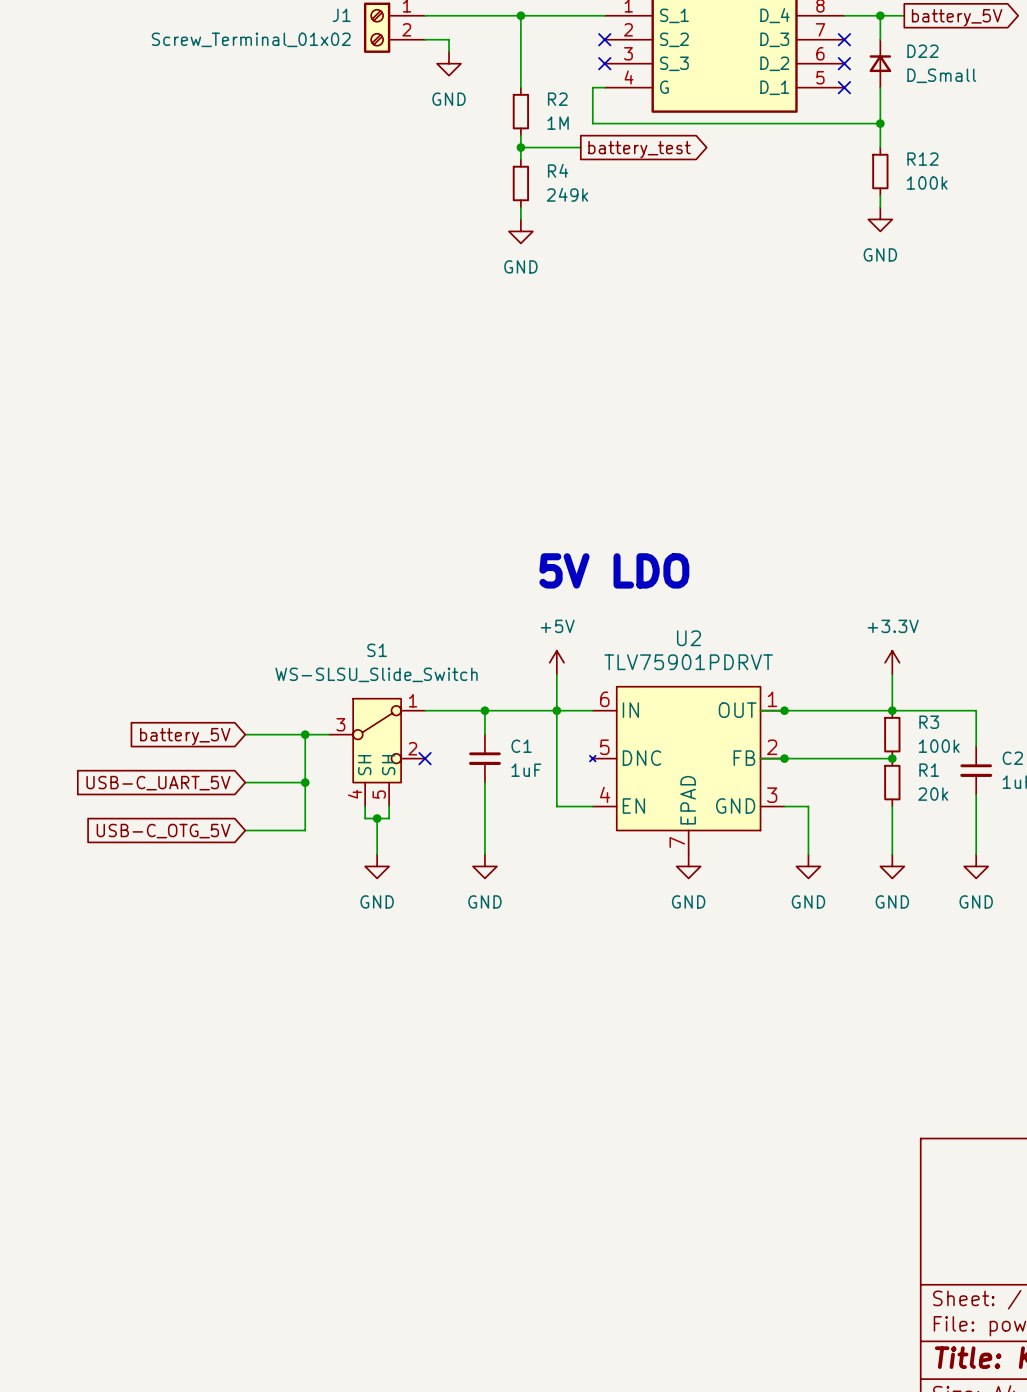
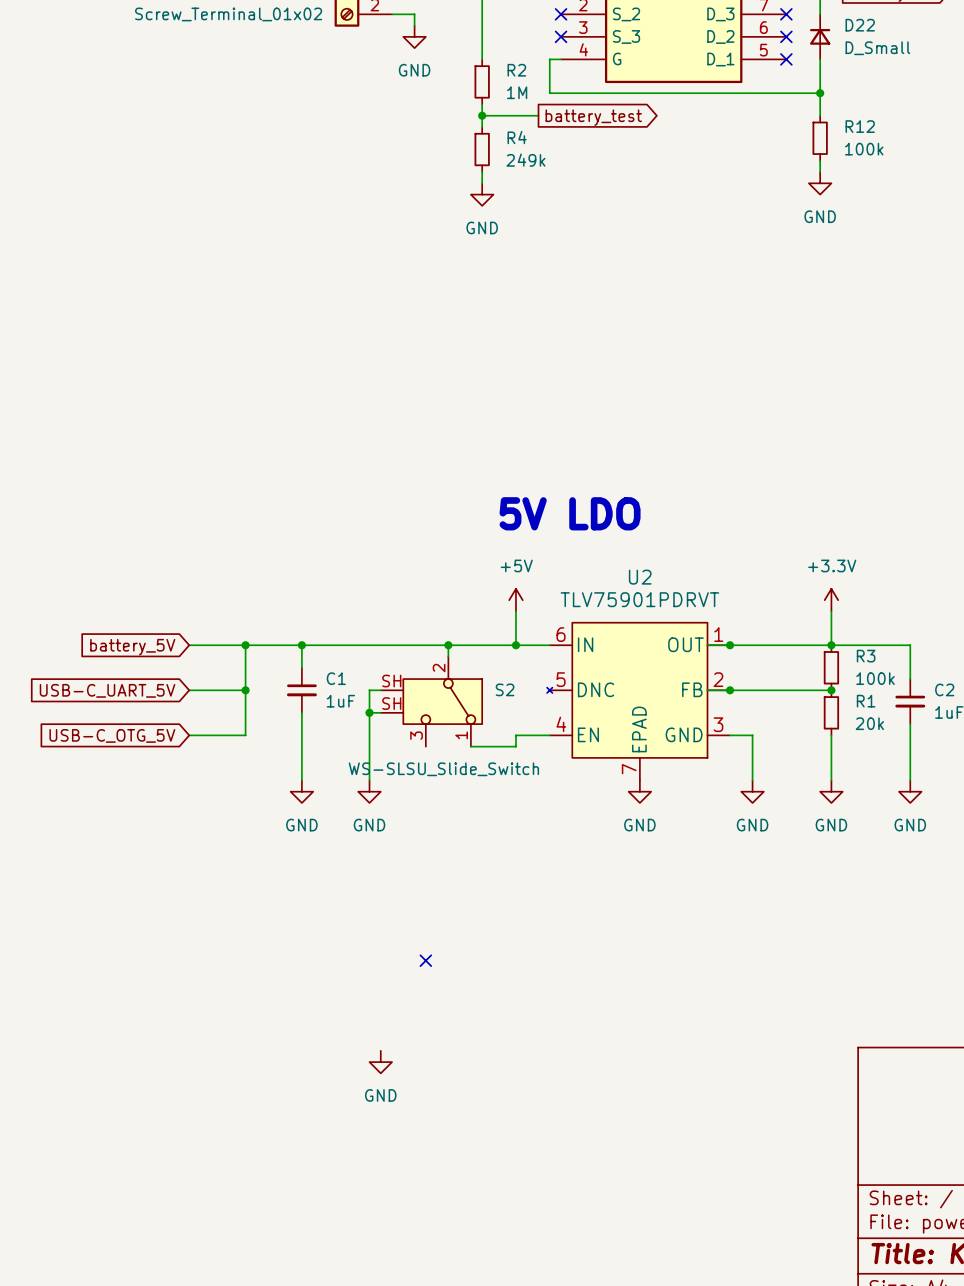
wire: none -> (189, 645) (392, 645)
junction: none -> (245, 645)
junction: none -> (301, 645)
wire: (556, 710) (556, 806) -> (470, 746) (515, 746) (515, 735)
wire: (245, 734) (329, 734) -> (301, 645) (301, 667)
wire: (305, 734) (305, 830) (245, 830) -> (245, 645) (245, 735) (189, 735)
junction: (305, 734) -> none
global label position: battery_5V (185, 736) -> battery_5V (132, 647)
S1: WS-SLSU_Slide_Switch (377, 752) -> none
junction: none -> (245, 690)
wire: none -> (380, 690) (369, 690) (369, 780)
no-connect mark: (425, 758) -> none
C1 position: (484, 758) -> (301, 690)
S2: none -> WS-SLSU_Slide_Switch (431, 701)
wire: (245, 782) (305, 782) -> (189, 690) (245, 690)
junction: (305, 782) -> none
wire: none -> (369, 712) (380, 712)
wire: (484, 782) (484, 854) -> (301, 712) (301, 780)
global label position: USB-C_UART_5V (158, 783) -> USB-C_UART_5V (107, 690)
wire: (365, 806) (365, 818) (389, 818) (389, 806) -> none
wire: (377, 818) (377, 854) -> none
junction position: (377, 818) -> (369, 712)
global label position: USB-C_OTG_5V (163, 831) -> USB-C_OTG_5V (112, 735)
power symbol: none -> GND (301, 791)
power symbol: GND (377, 866) -> none
power symbol: none -> GND (369, 791)
power symbol: GND (484, 866) -> none
no-connect mark: none -> (425, 960)
power symbol: none -> GND (380, 1062)

